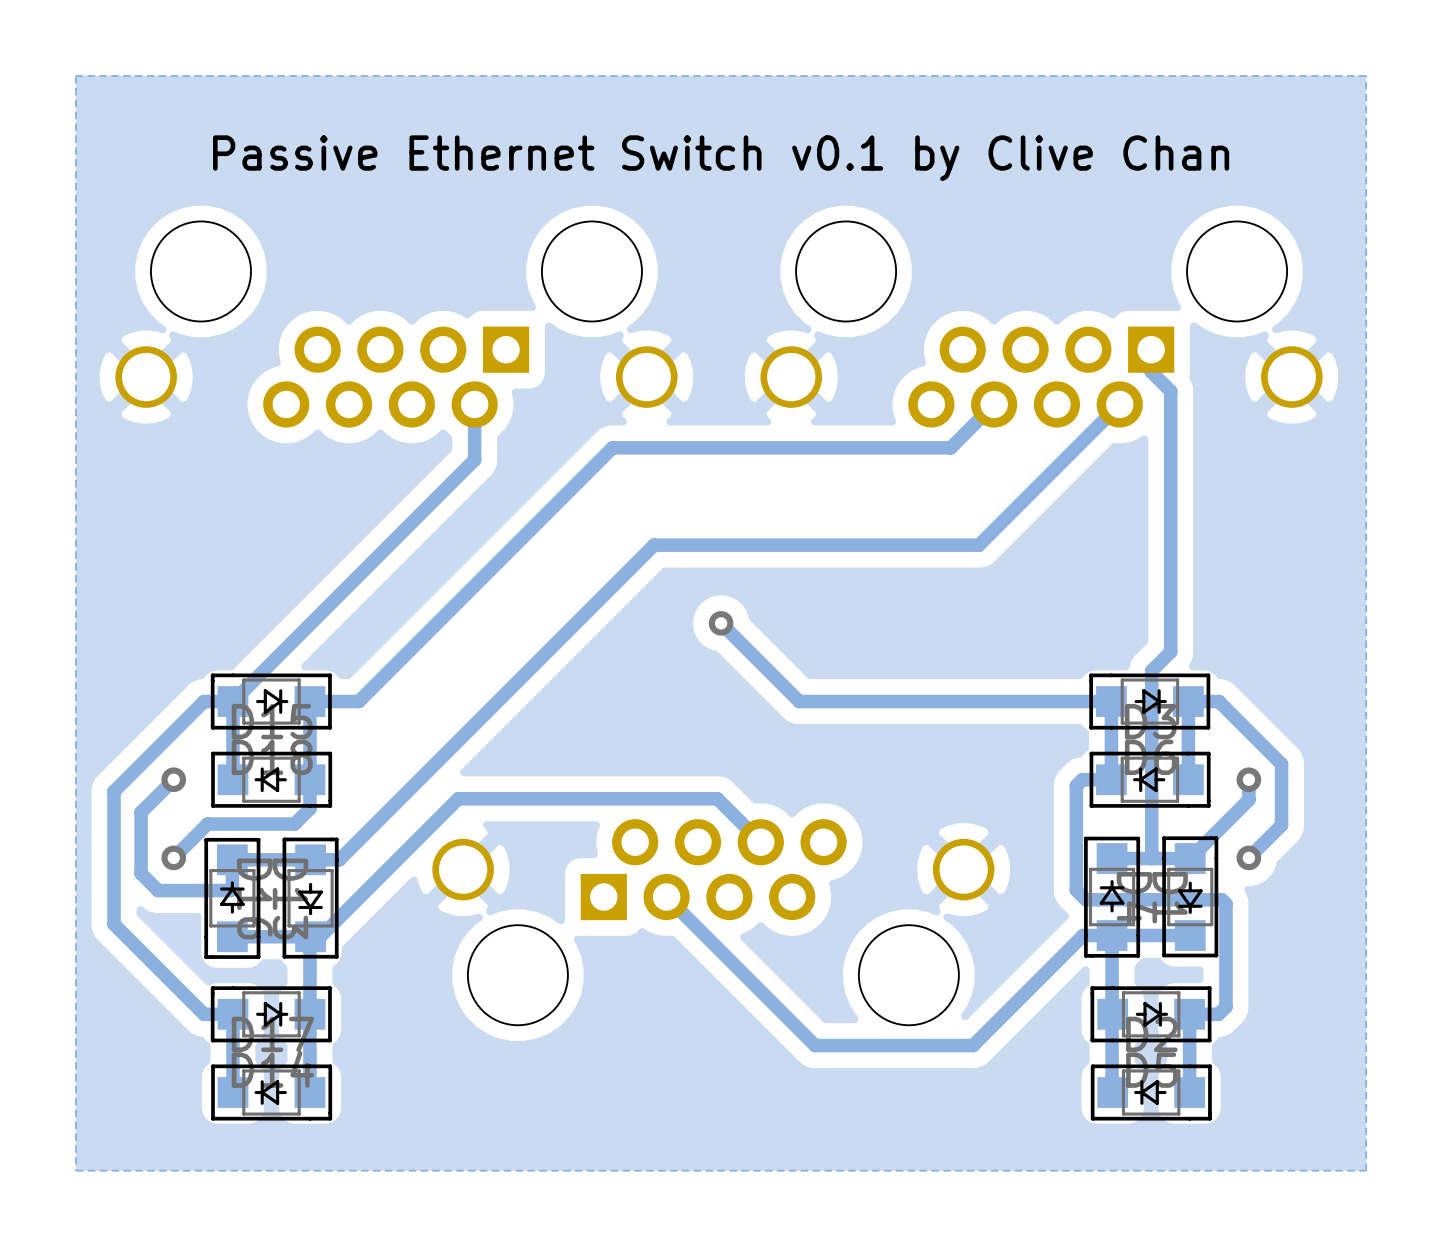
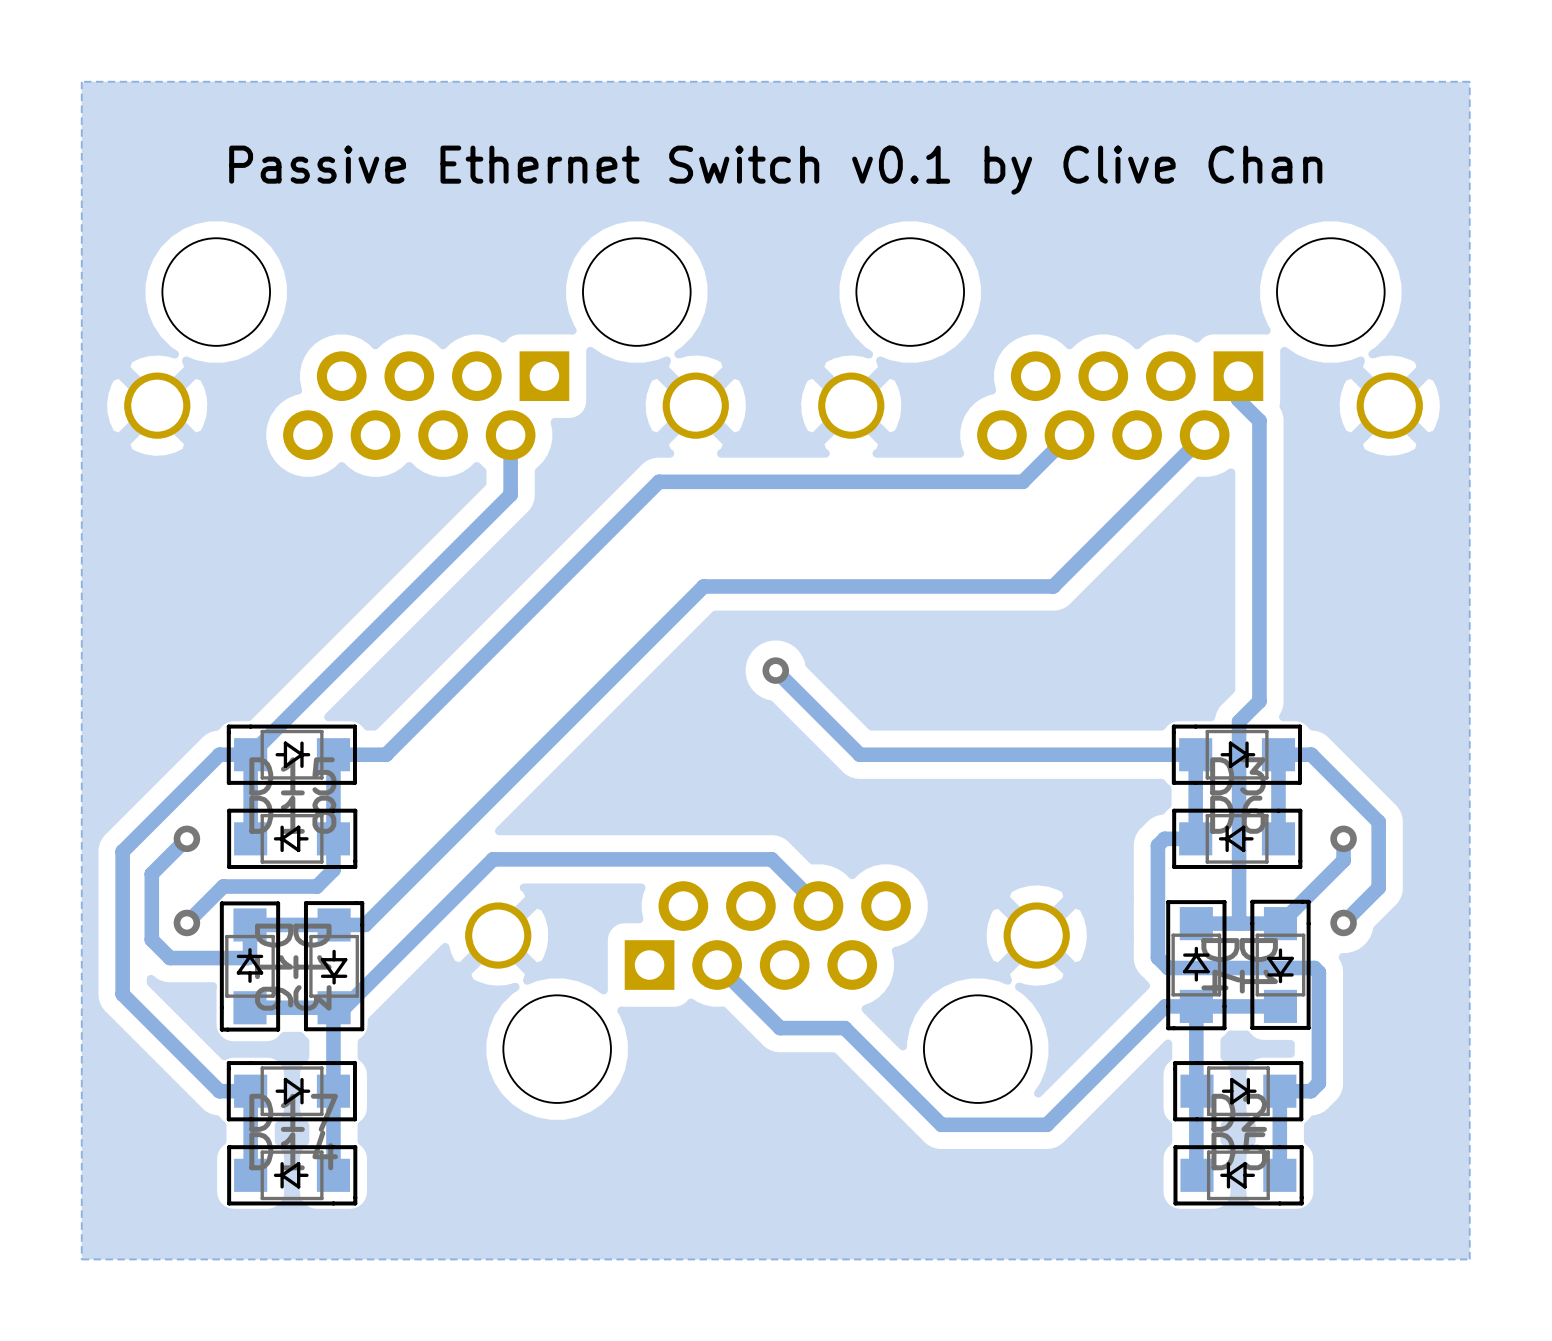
track: (725, 955) (815, 1045) (875, 1045) -> (780, 1028) (844, 1028) (941, 1124)

